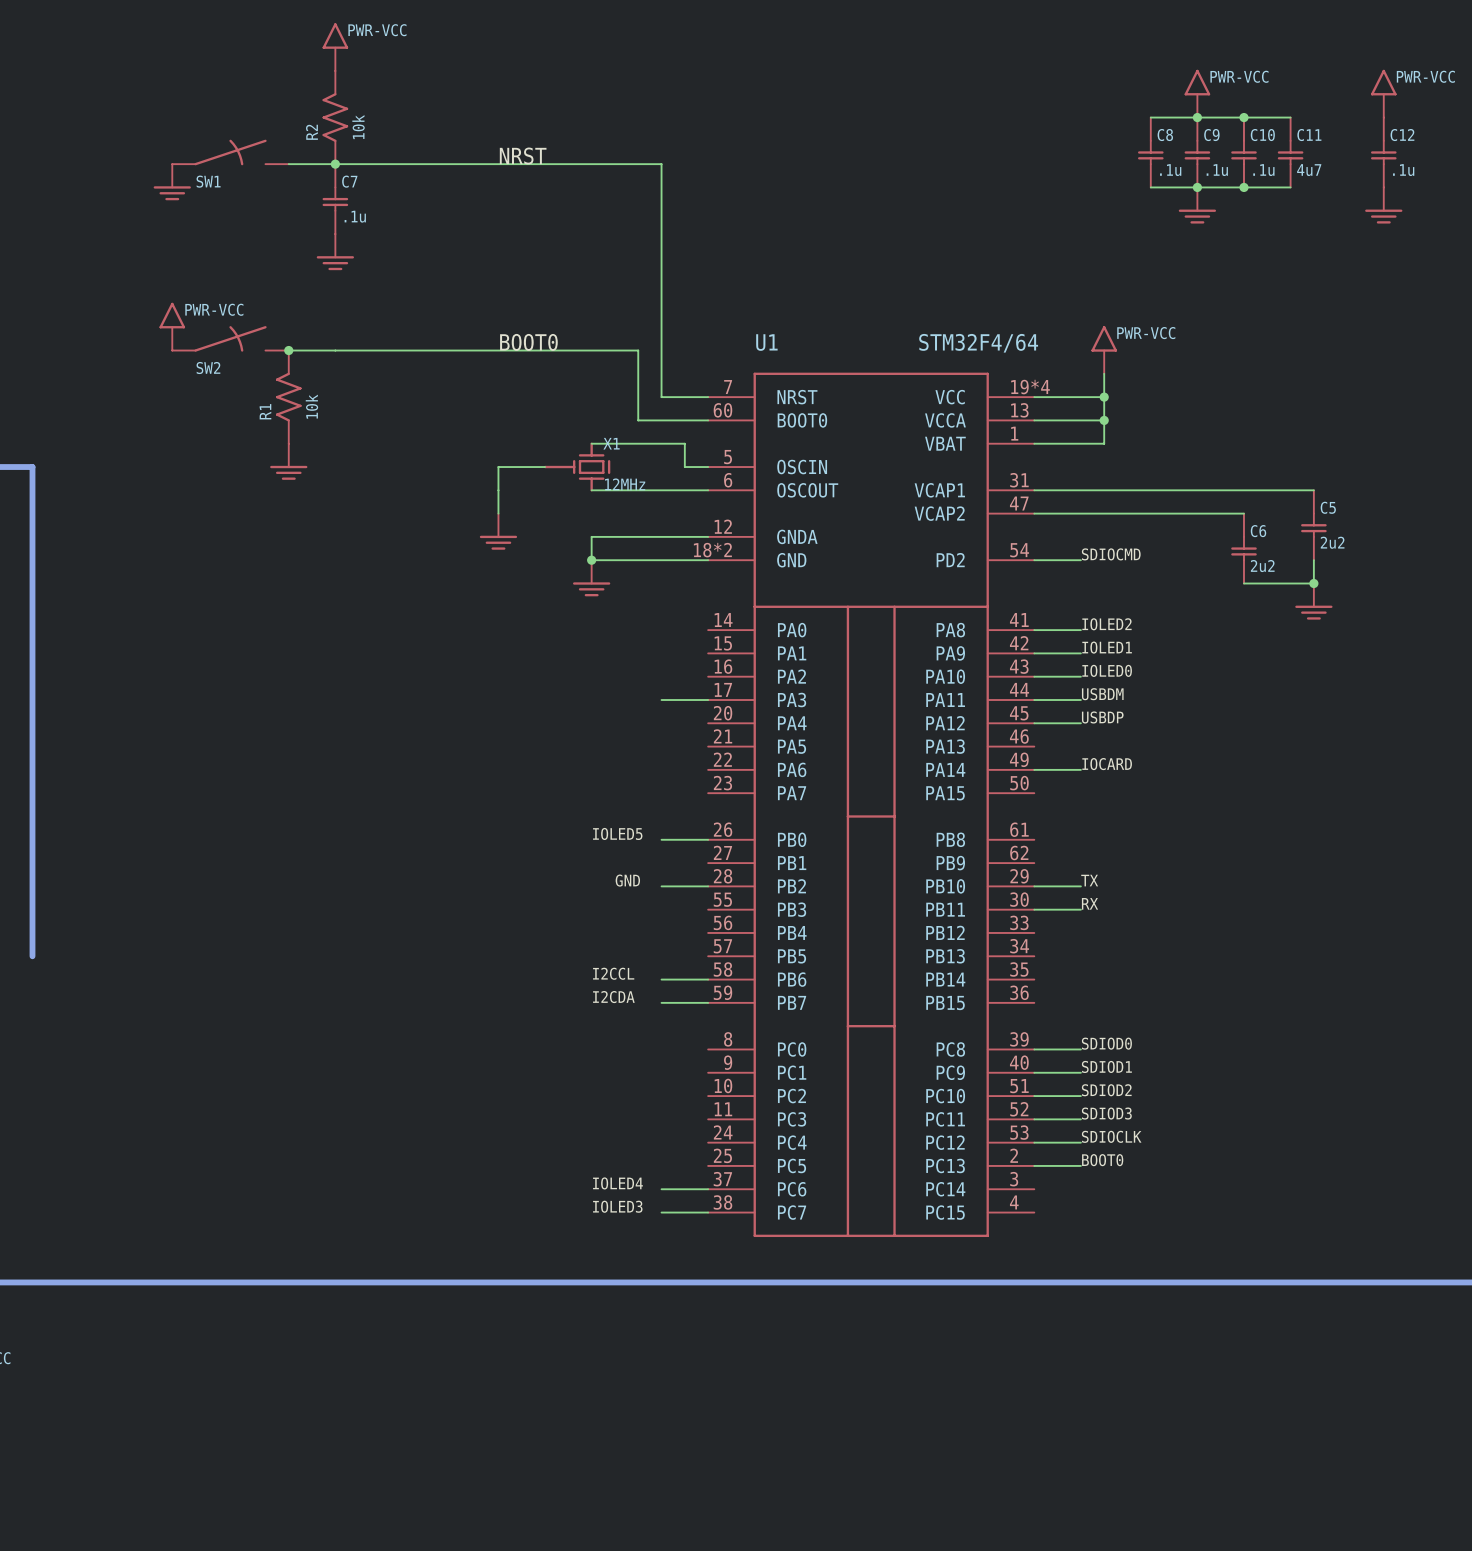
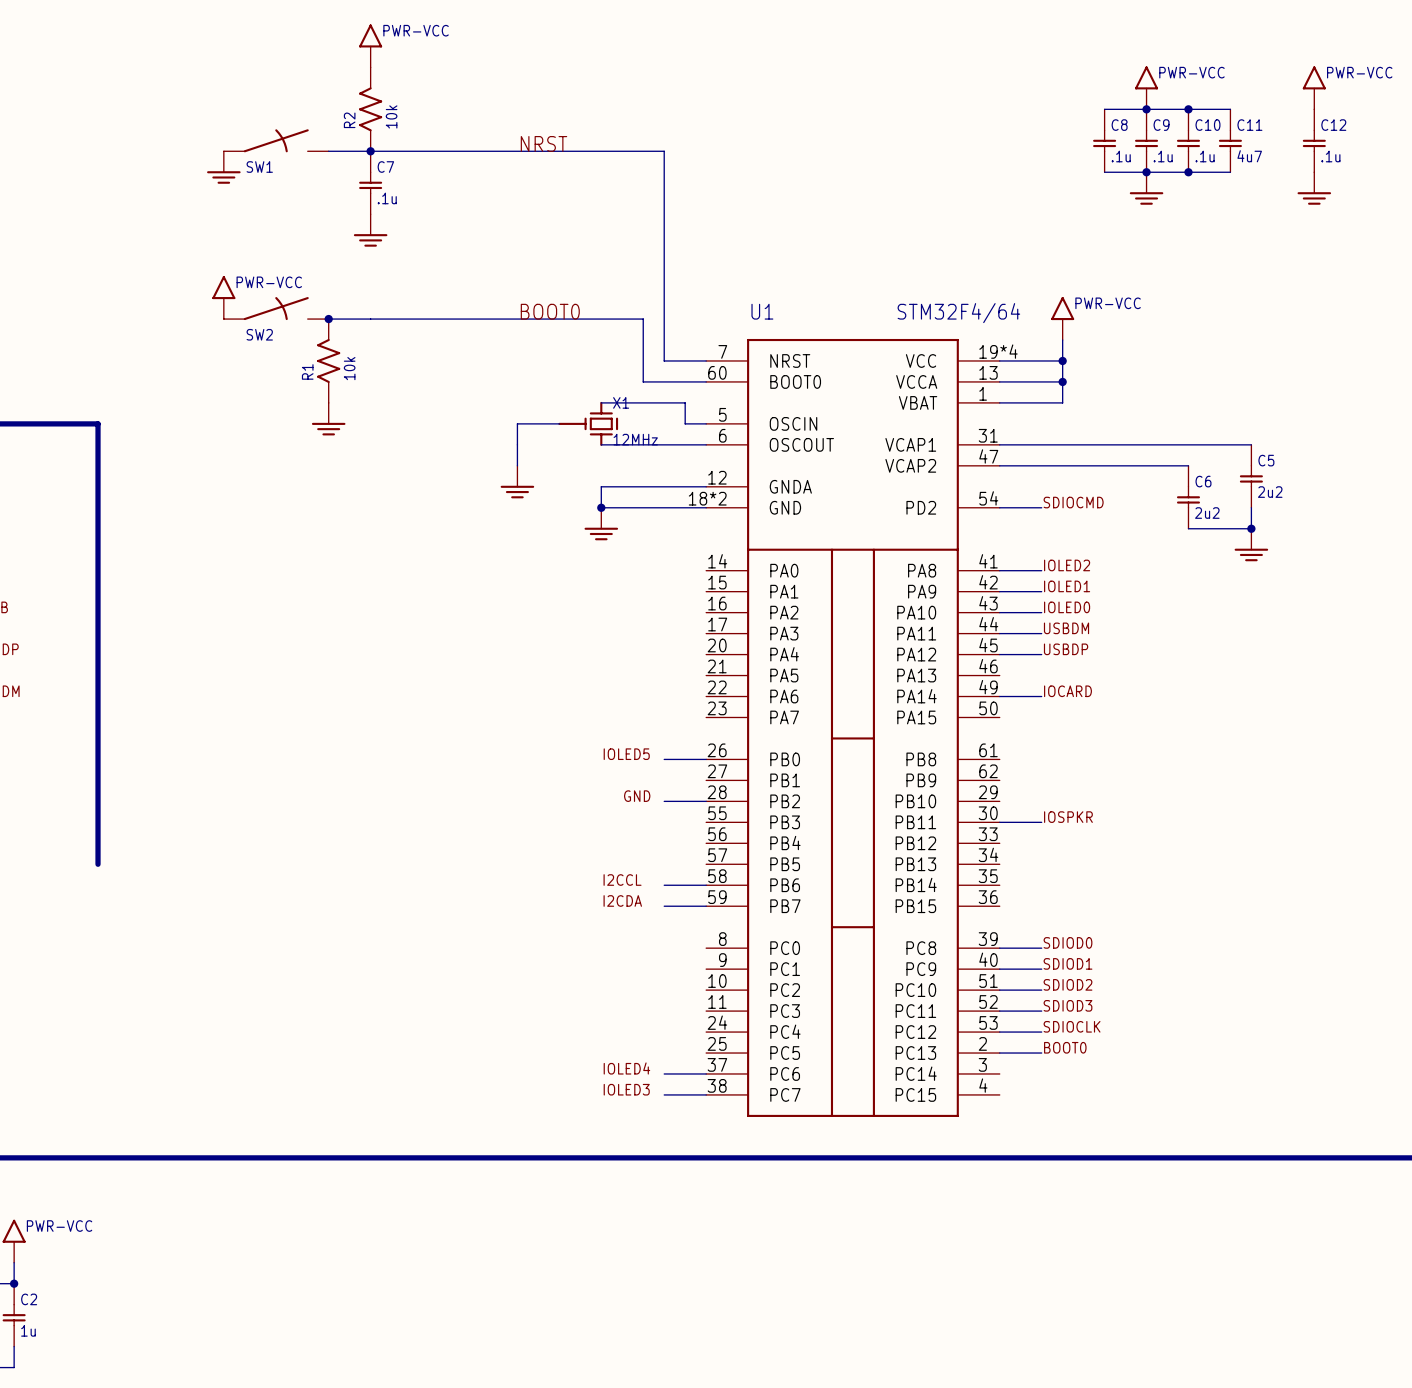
wire: (661, 700) (708, 700) -> none
label: TX (1089, 880) -> none
wire: (1034, 886) (1080, 886) -> none
label: RX (1090, 903) -> IOSPKR (1068, 817)

